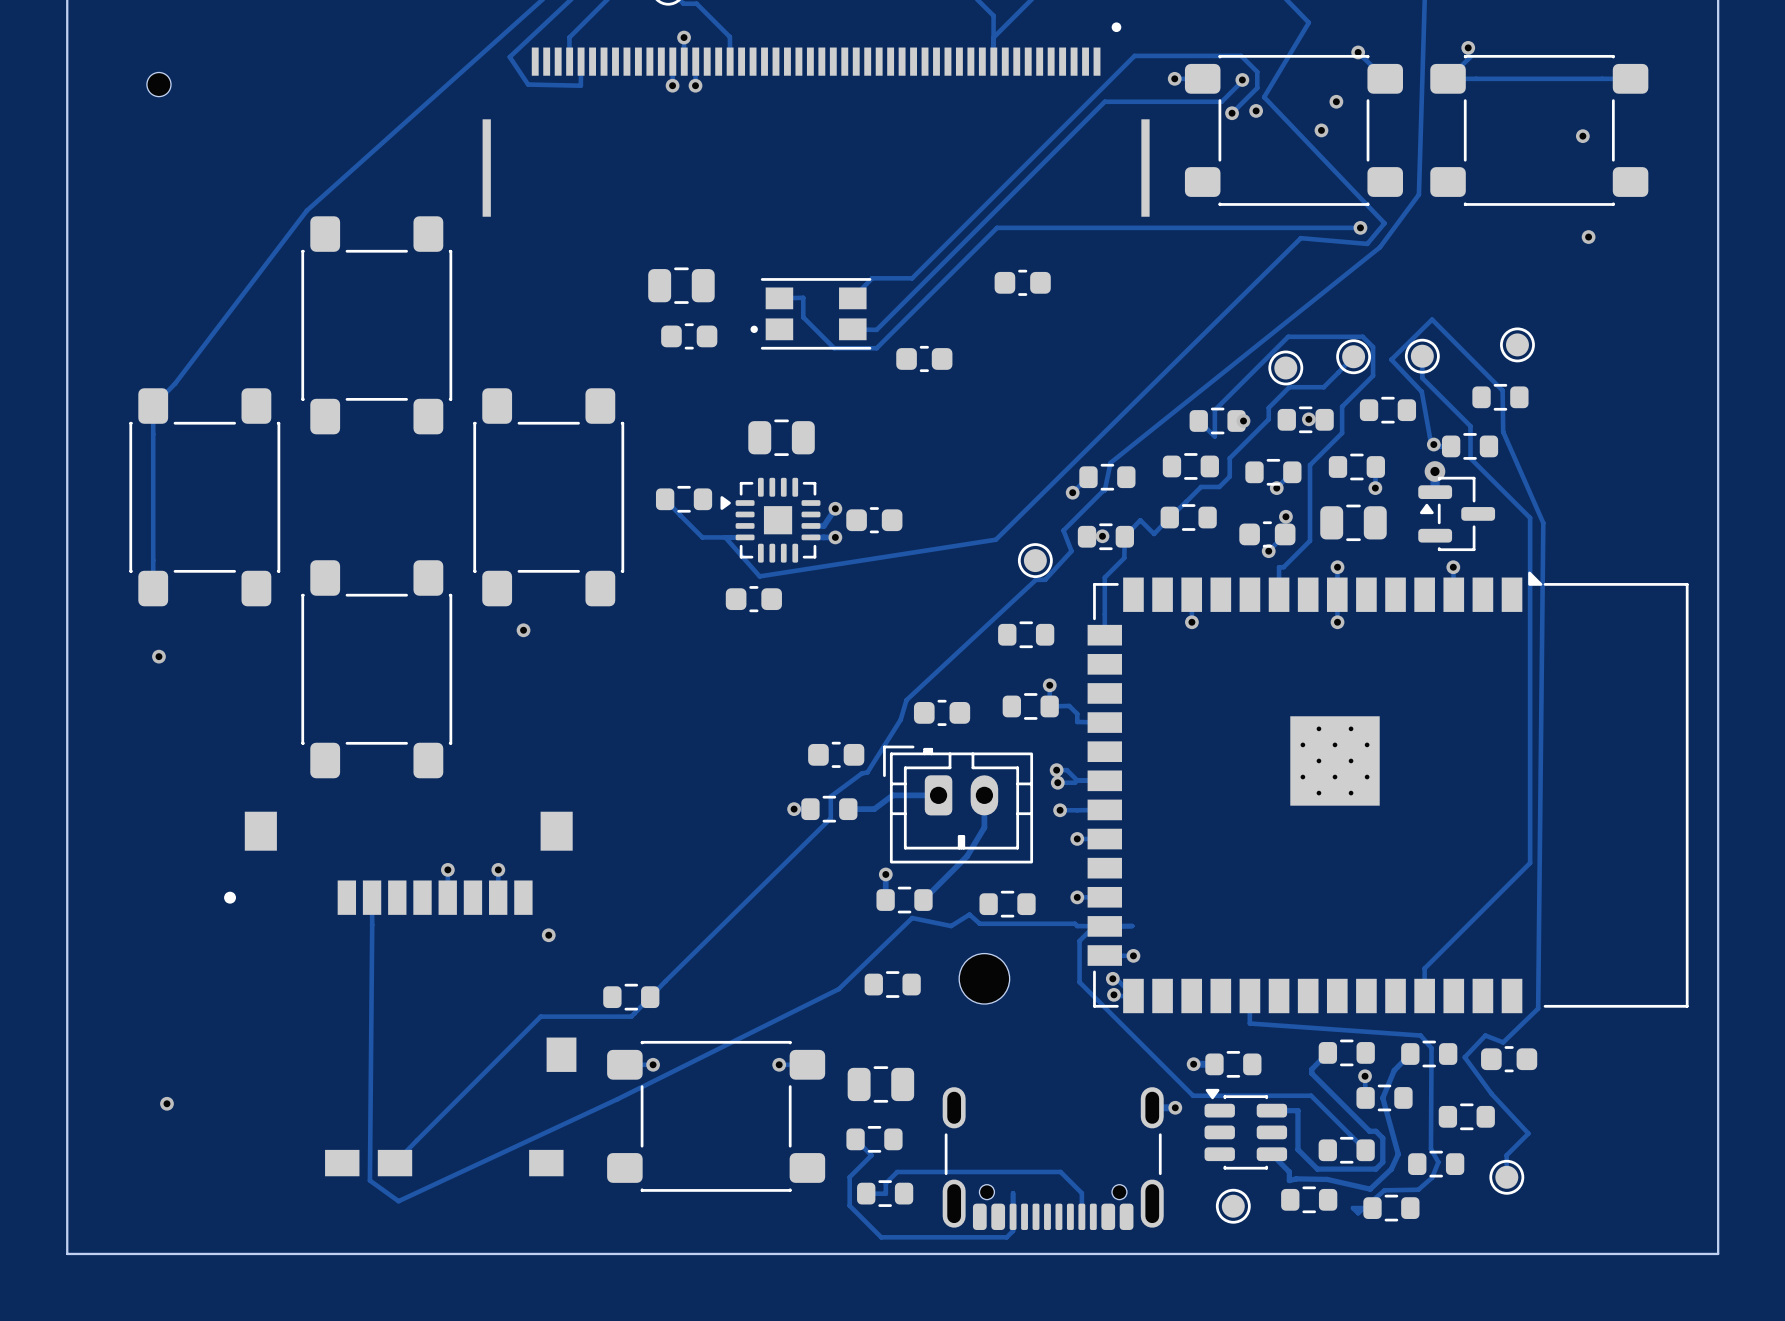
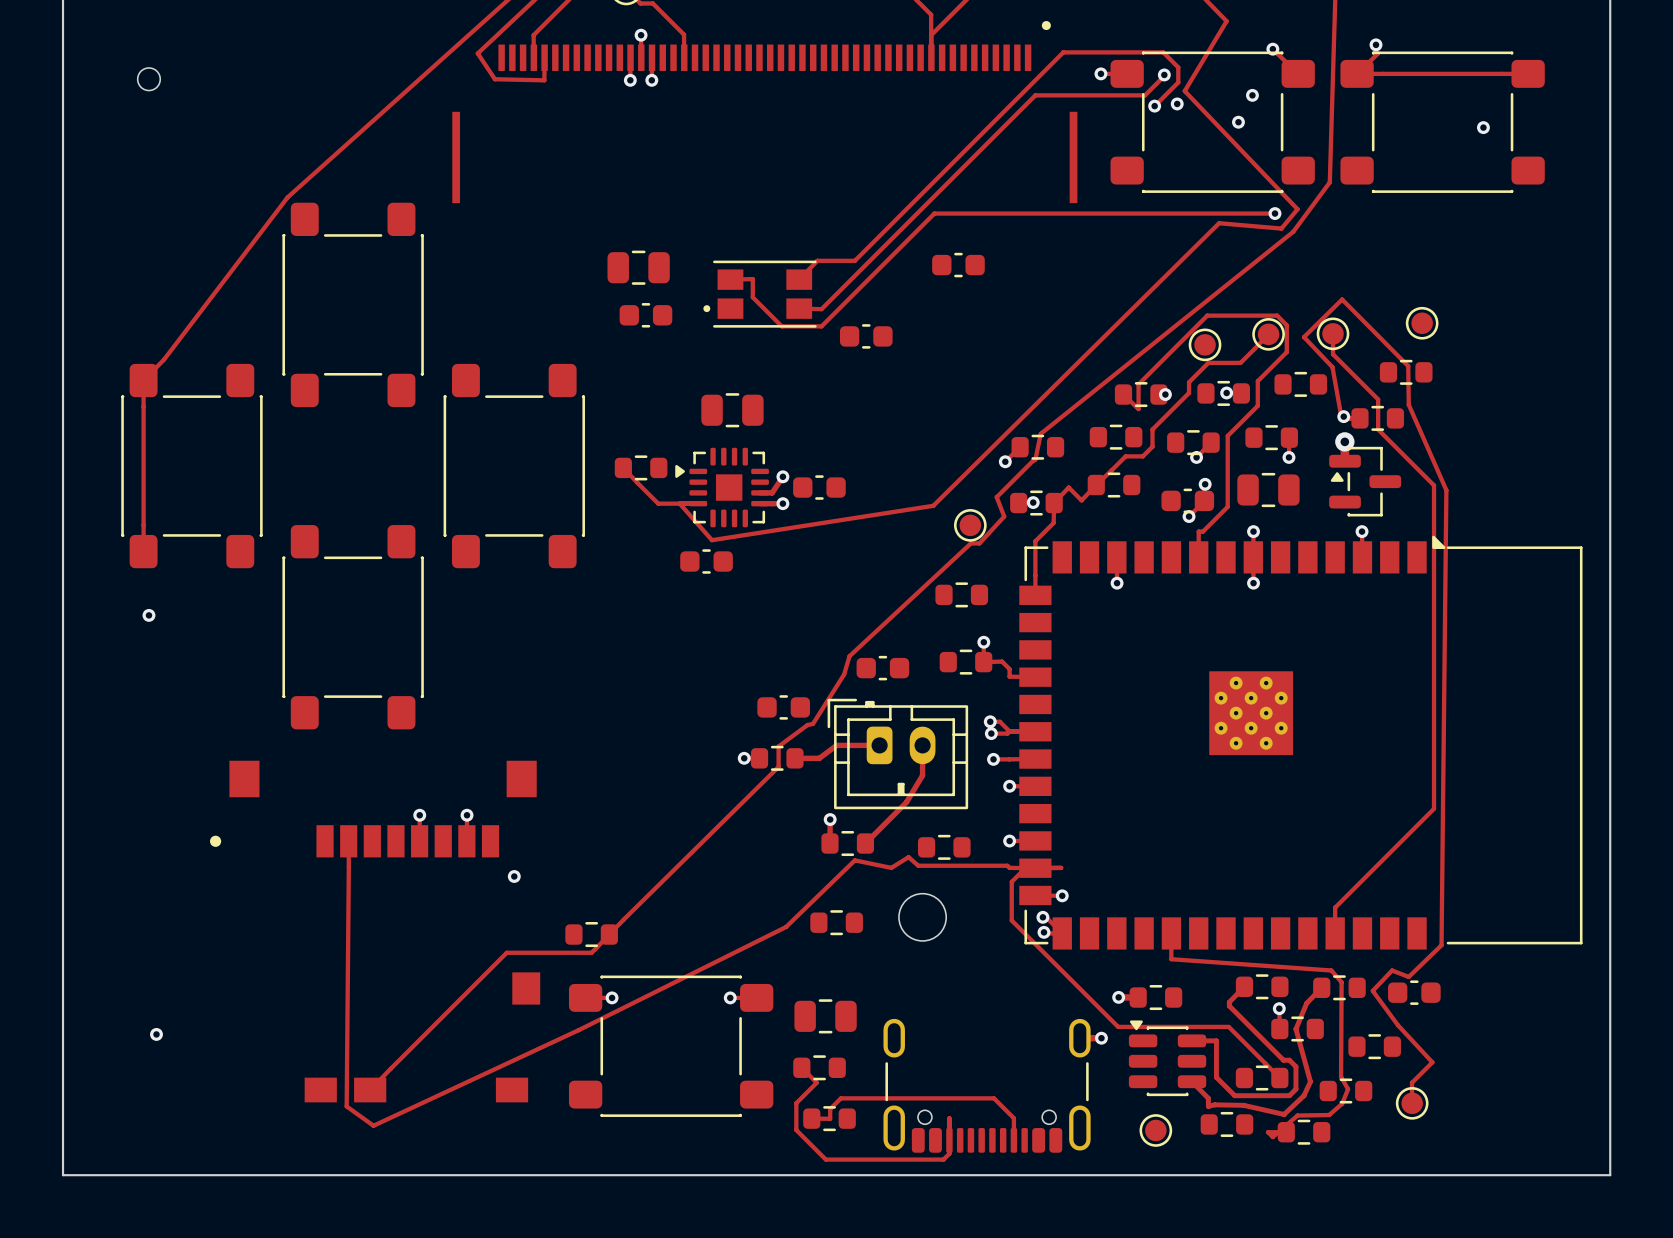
via: (1588, 237) -> none
via: (523, 630) -> none

